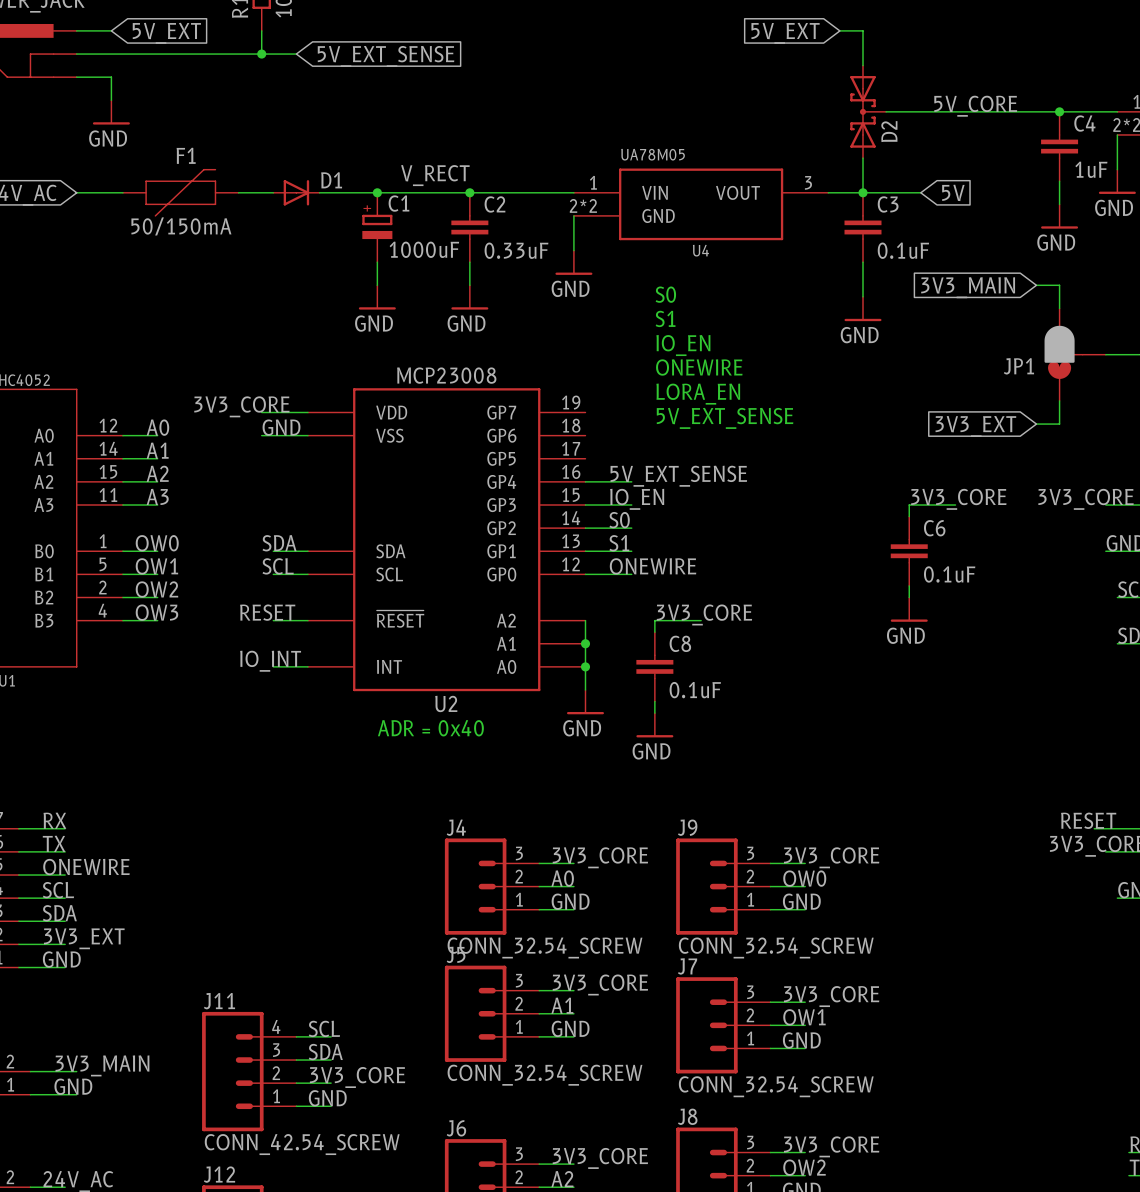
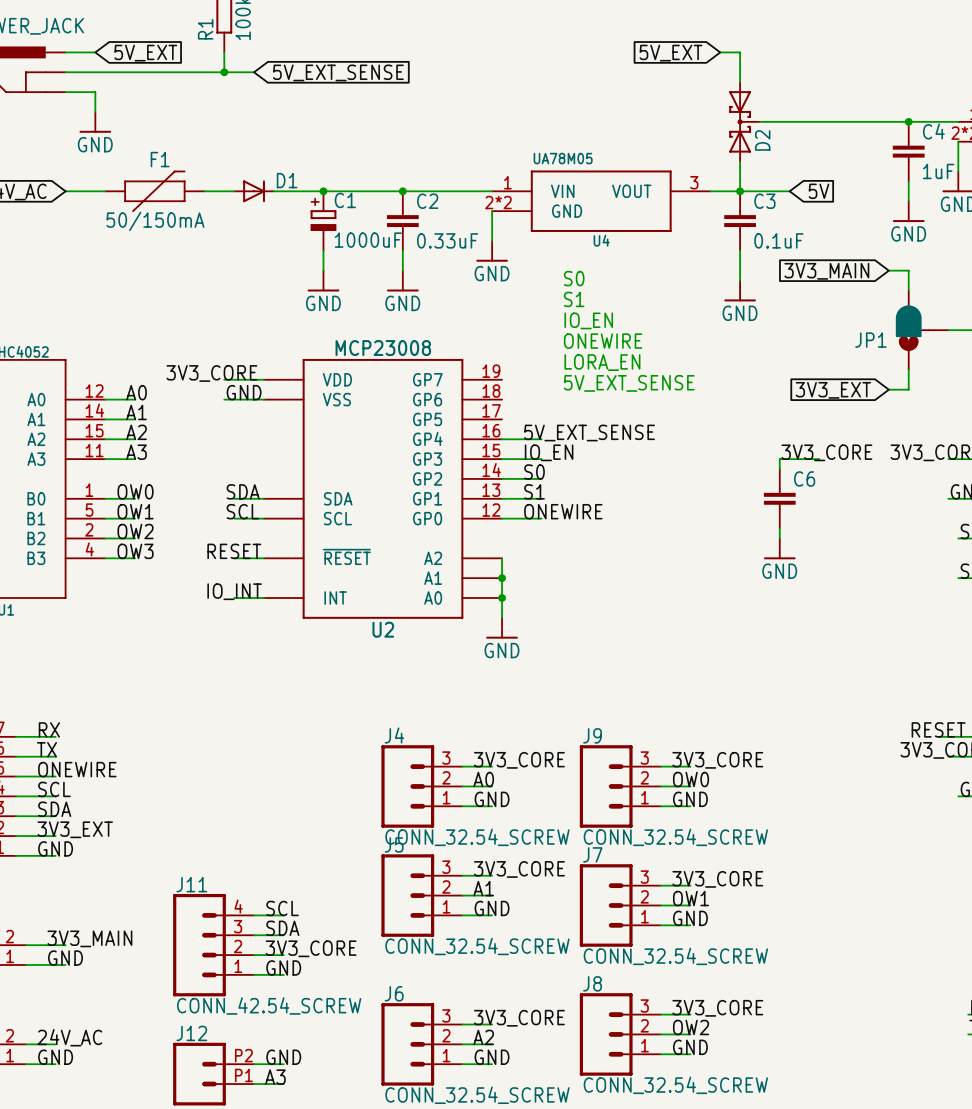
label: 5V_CORE (975, 106) -> none
label: V_RECT (435, 175) -> none
C6 value: 0.1uF (949, 574) -> none
label: 3V3_CORE (704, 614) -> none
wire: (701, 620) (654, 620) (654, 632) -> none
C8: 0.1uF (654, 666) -> none
wire: (654, 701) (654, 713) -> none
power symbol: GND (654, 725) -> none
text: ADR = 0x40 (430, 728) -> none

